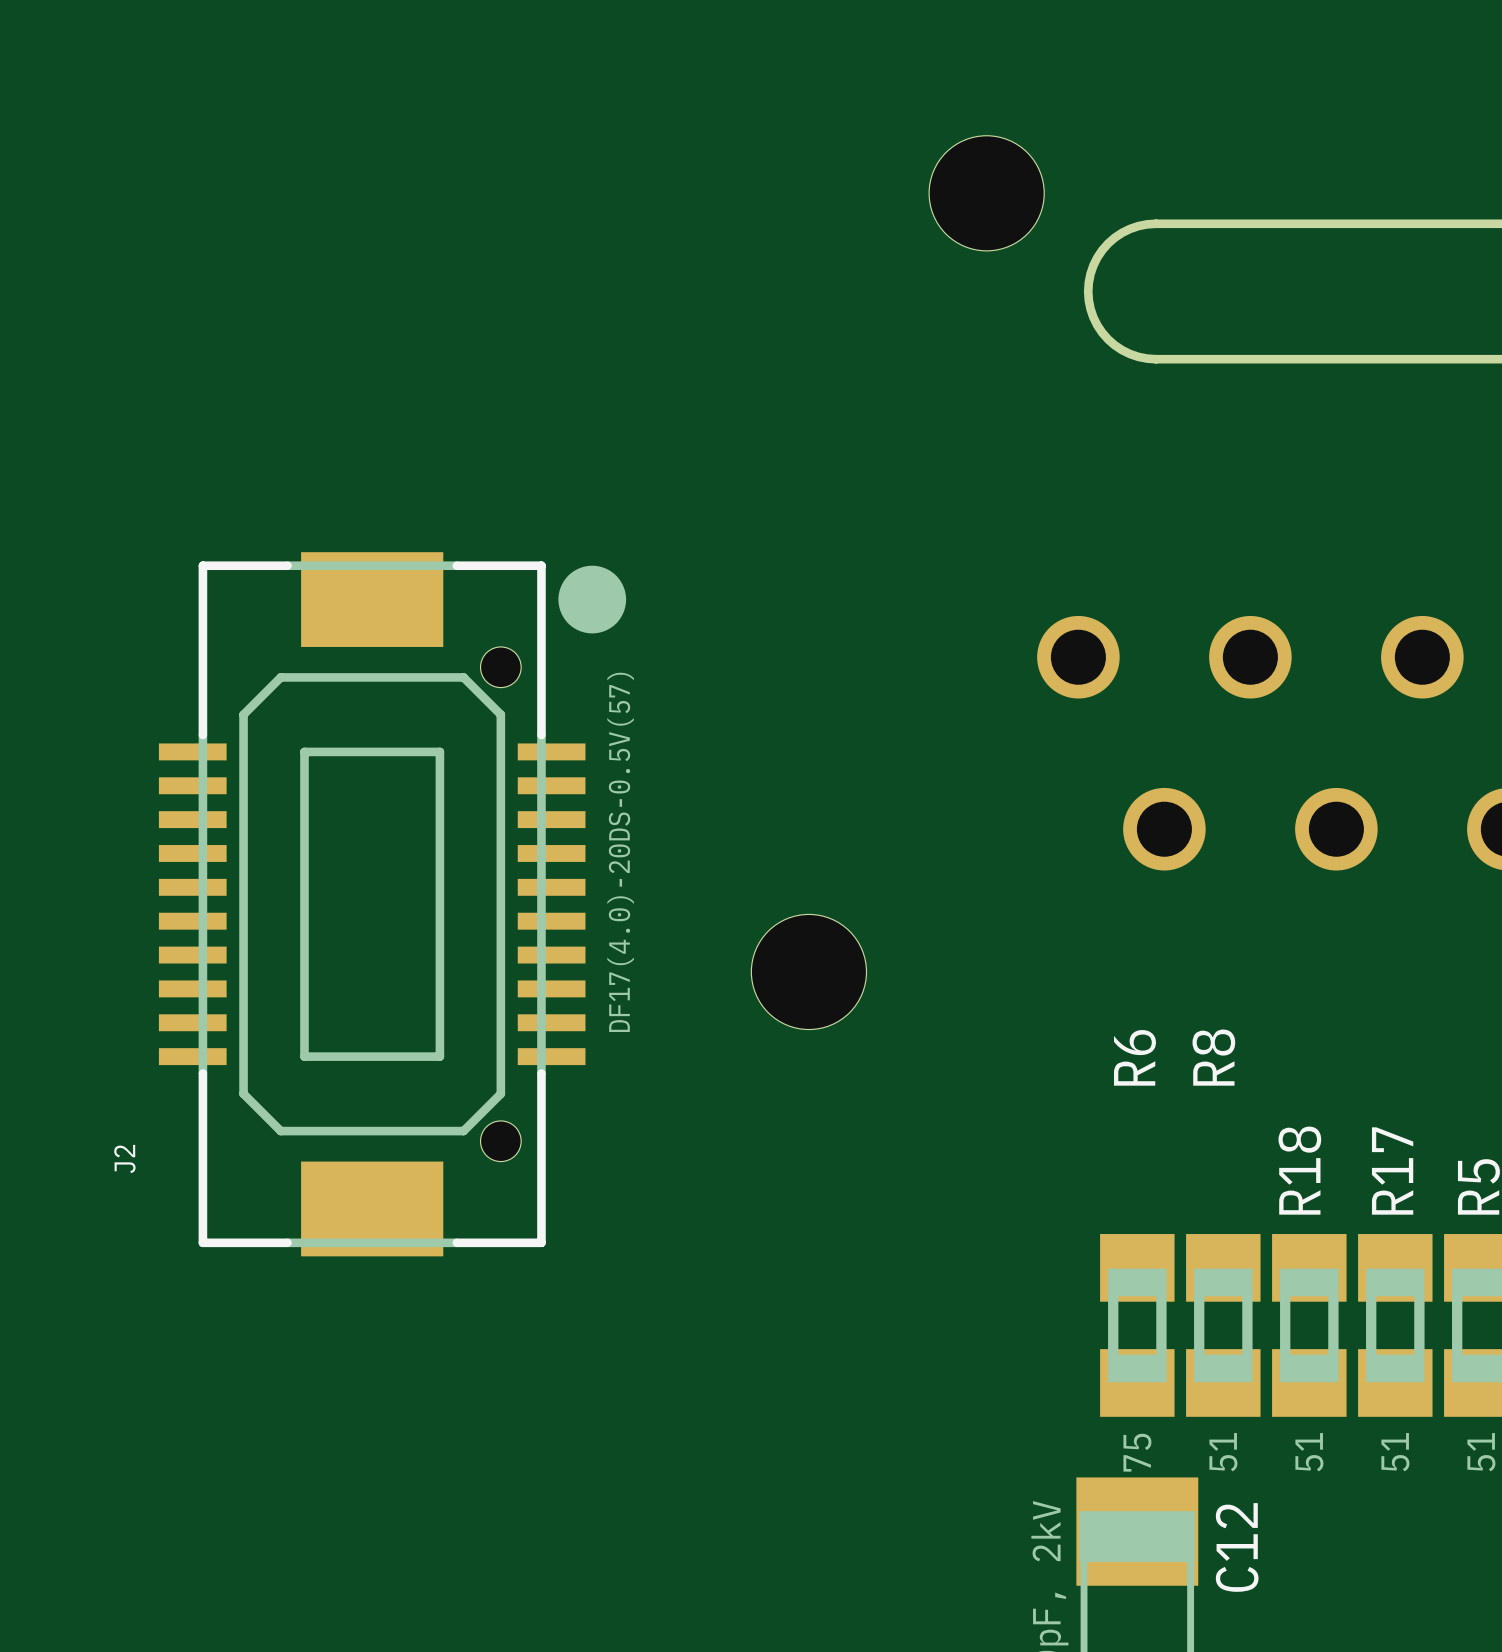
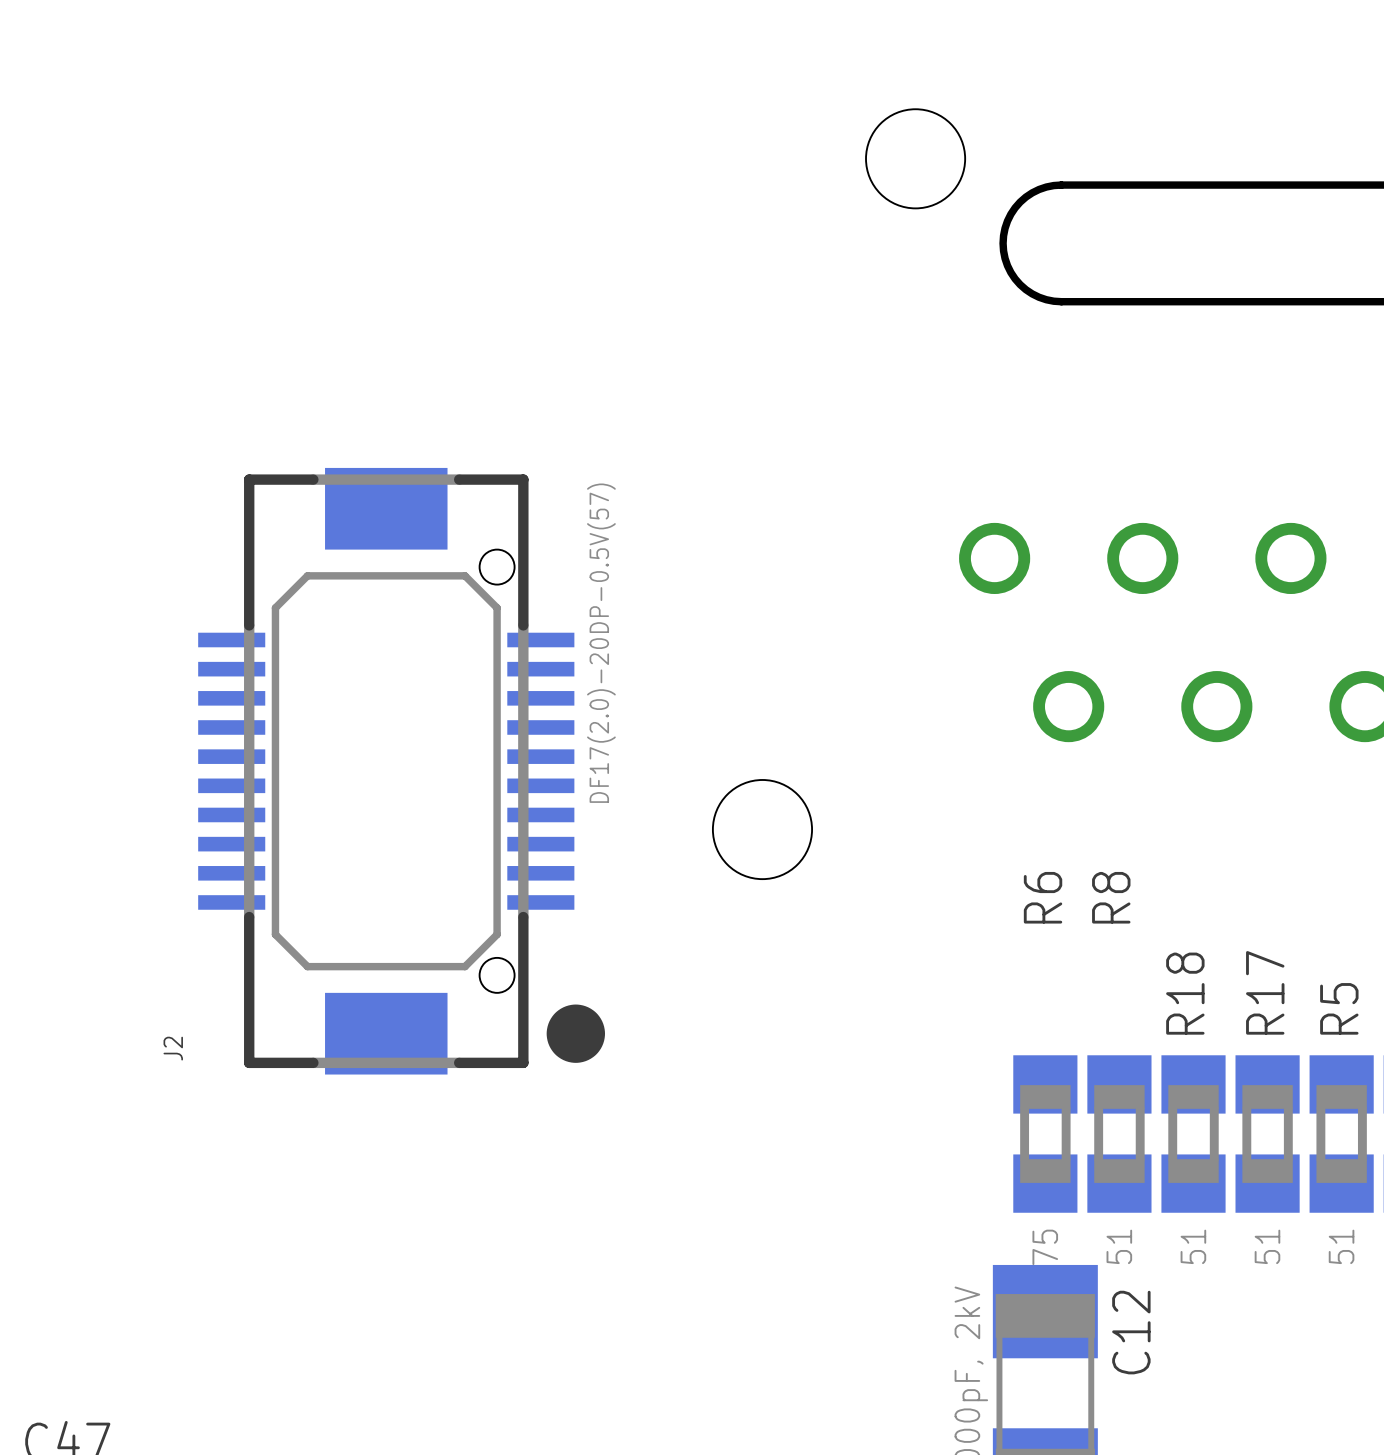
J2 footprint: [158, 552, 627, 1257] -> [198, 467, 605, 1075]
J2 value: DF17(4.0)-20DS-0.5V(57) (620, 852) -> DF17(2.0)-20DP-0.5V(57) (601, 643)

